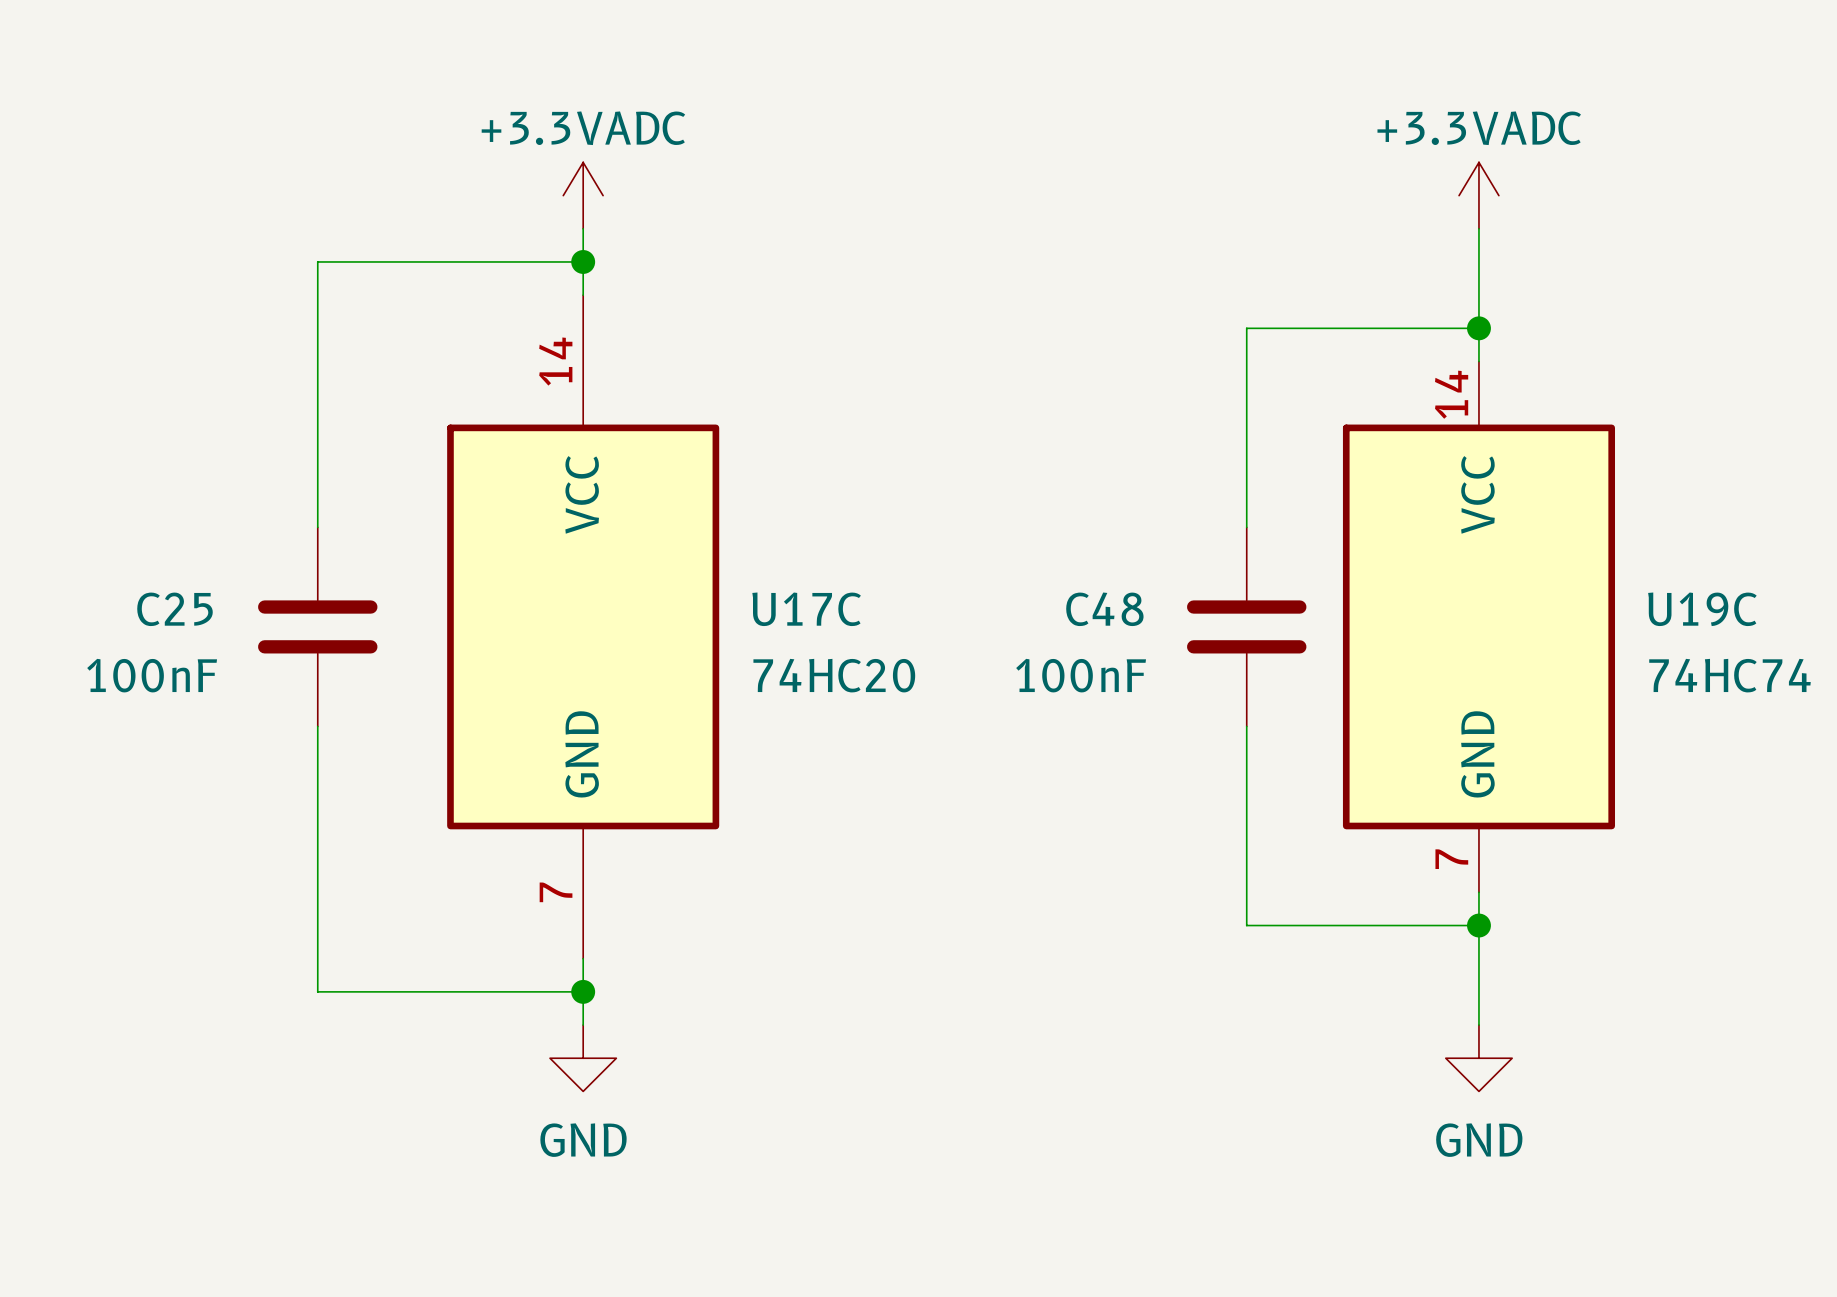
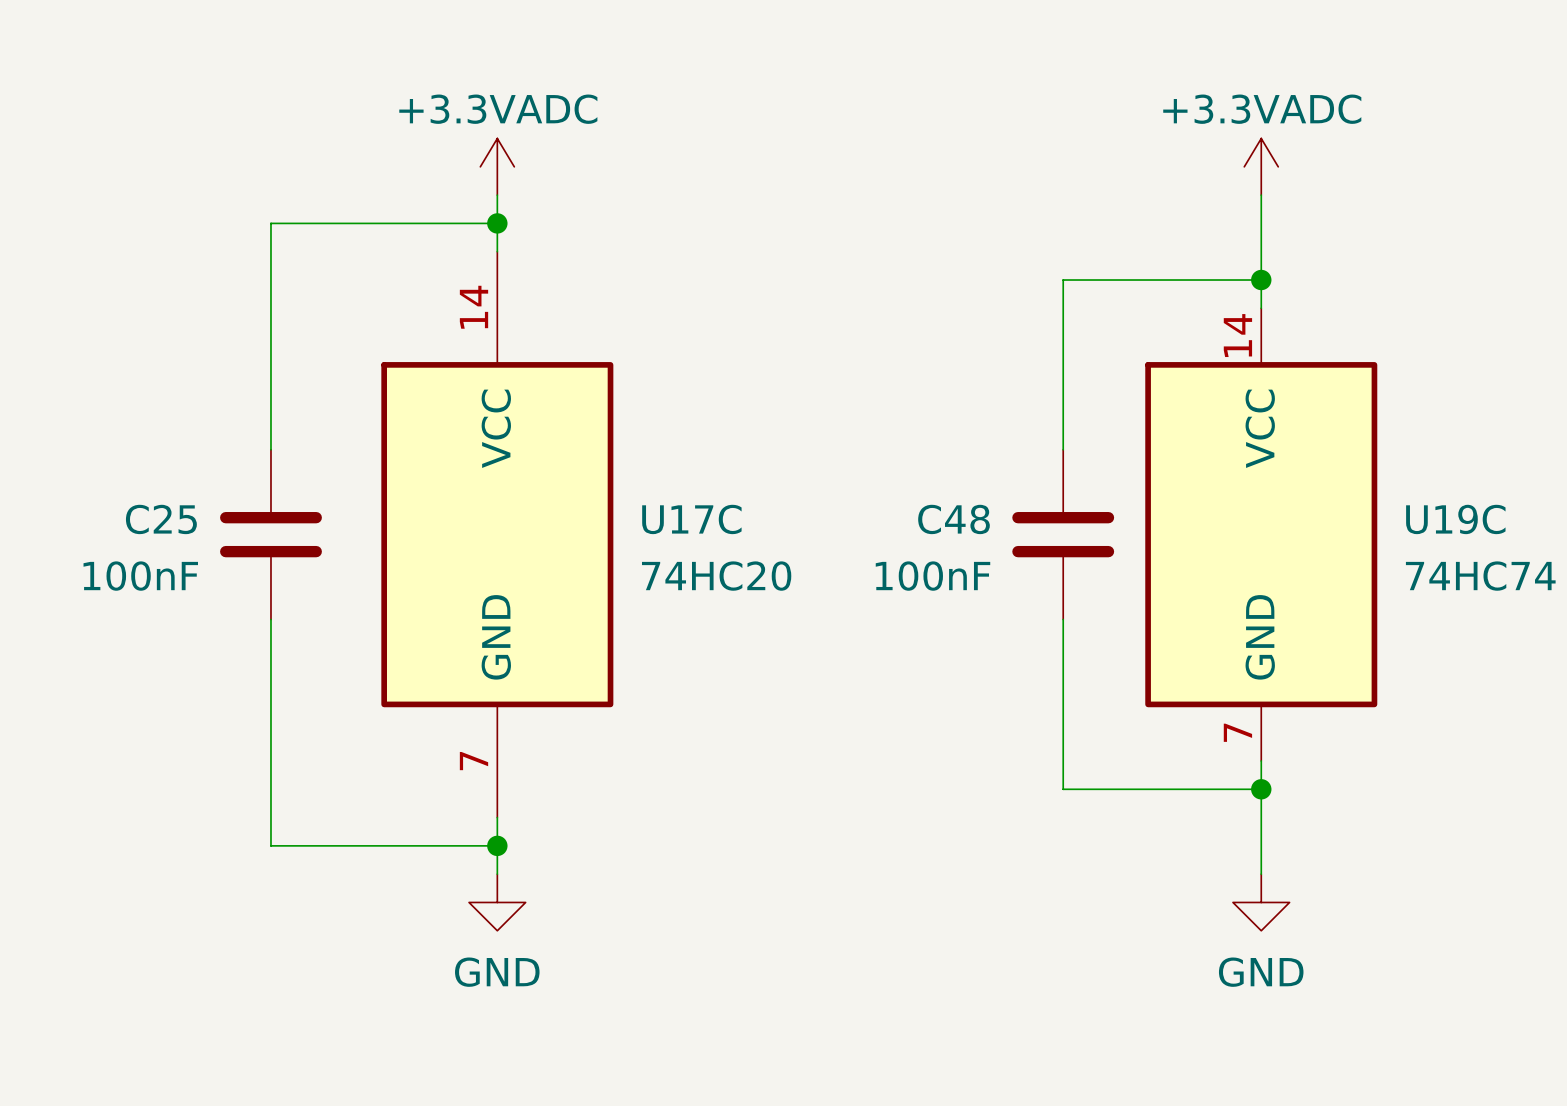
C25 name position: C25 (174, 609) -> C25 (161, 519)
C48 name position: C48 (1104, 609) -> C48 (954, 519)
C25 value position: 100nF (152, 675) -> 100nF (140, 576)
C48 value position: 100nF (1081, 675) -> 100nF (932, 576)

